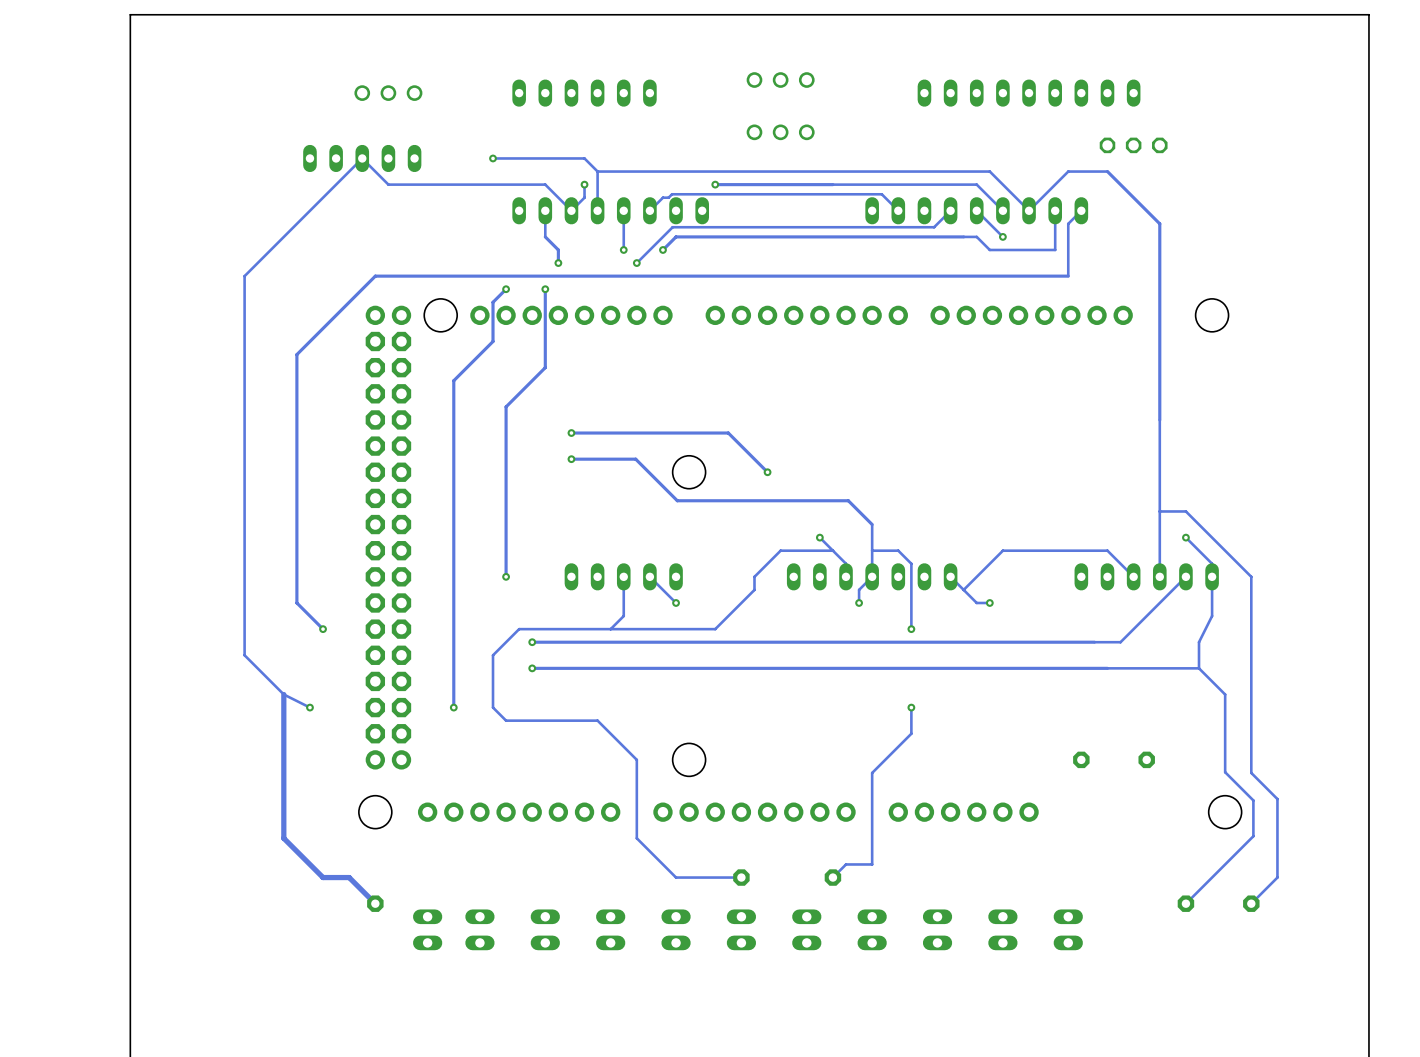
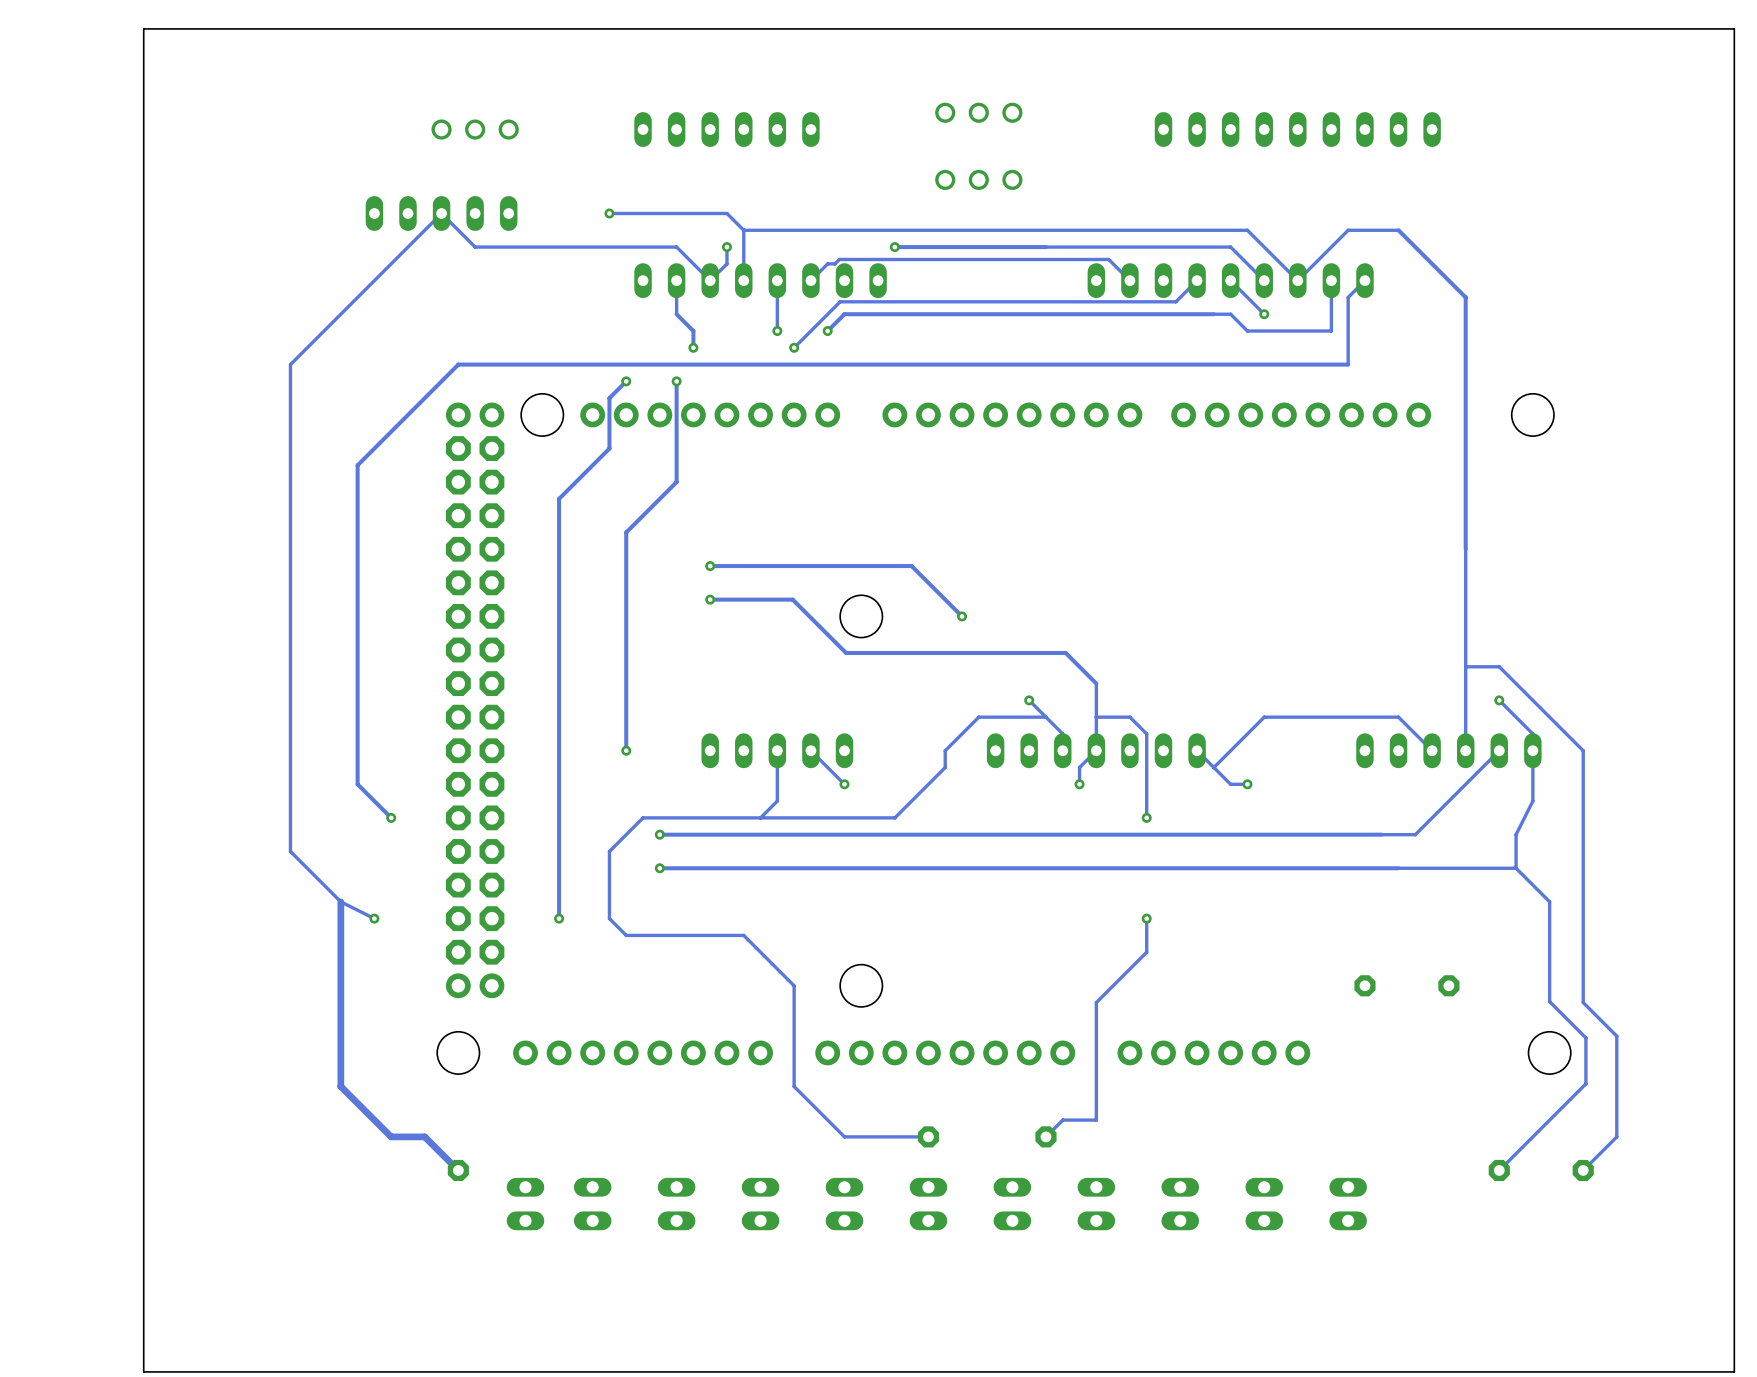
part: (1133, 145) -> none

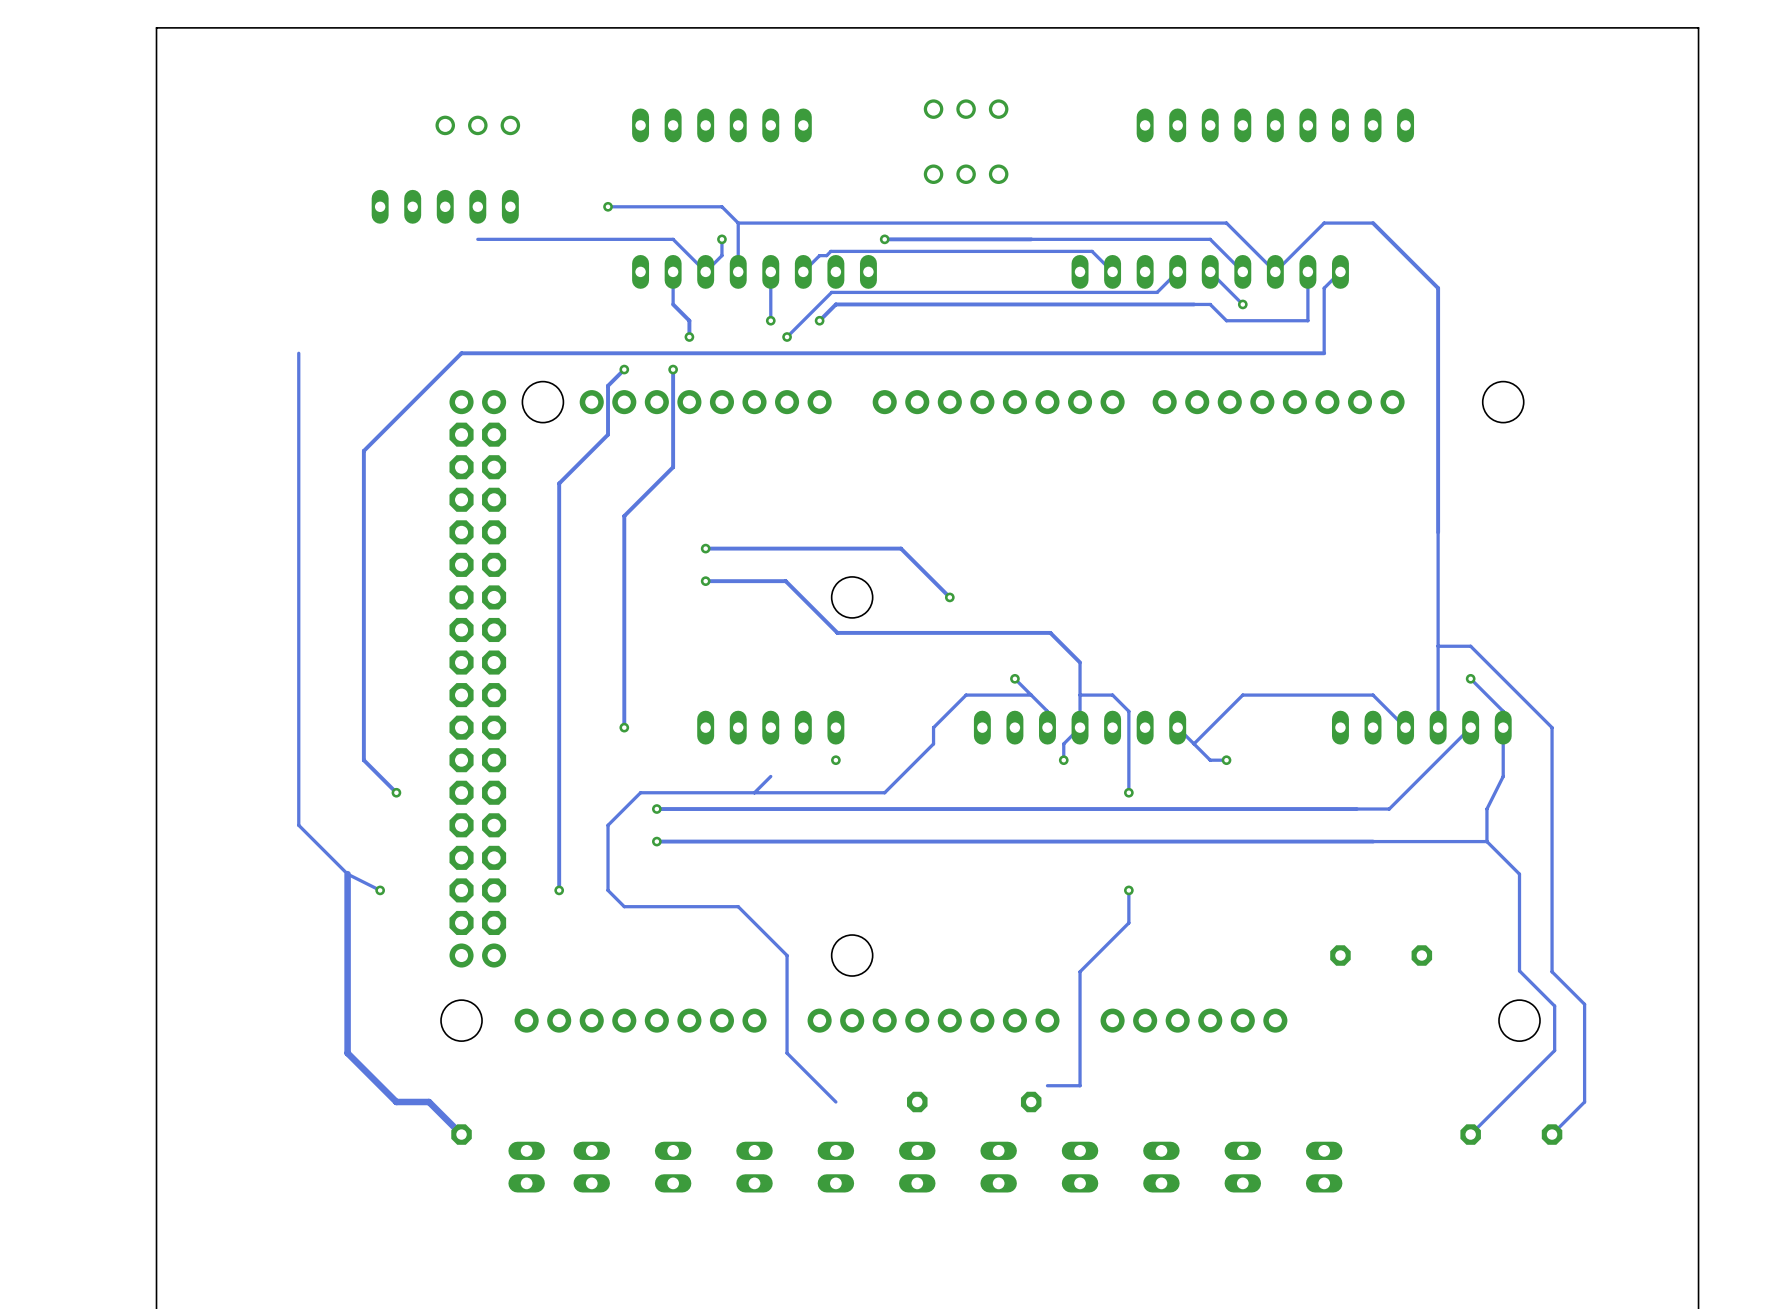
track: (475, 247) (441, 213) (290, 364) -> none
track: (777, 750) (777, 801) -> none
track: (810, 750) (844, 784) -> none
track: (1062, 1120) (1045, 1136) -> none
track: (928, 1136) (844, 1136) -> none

